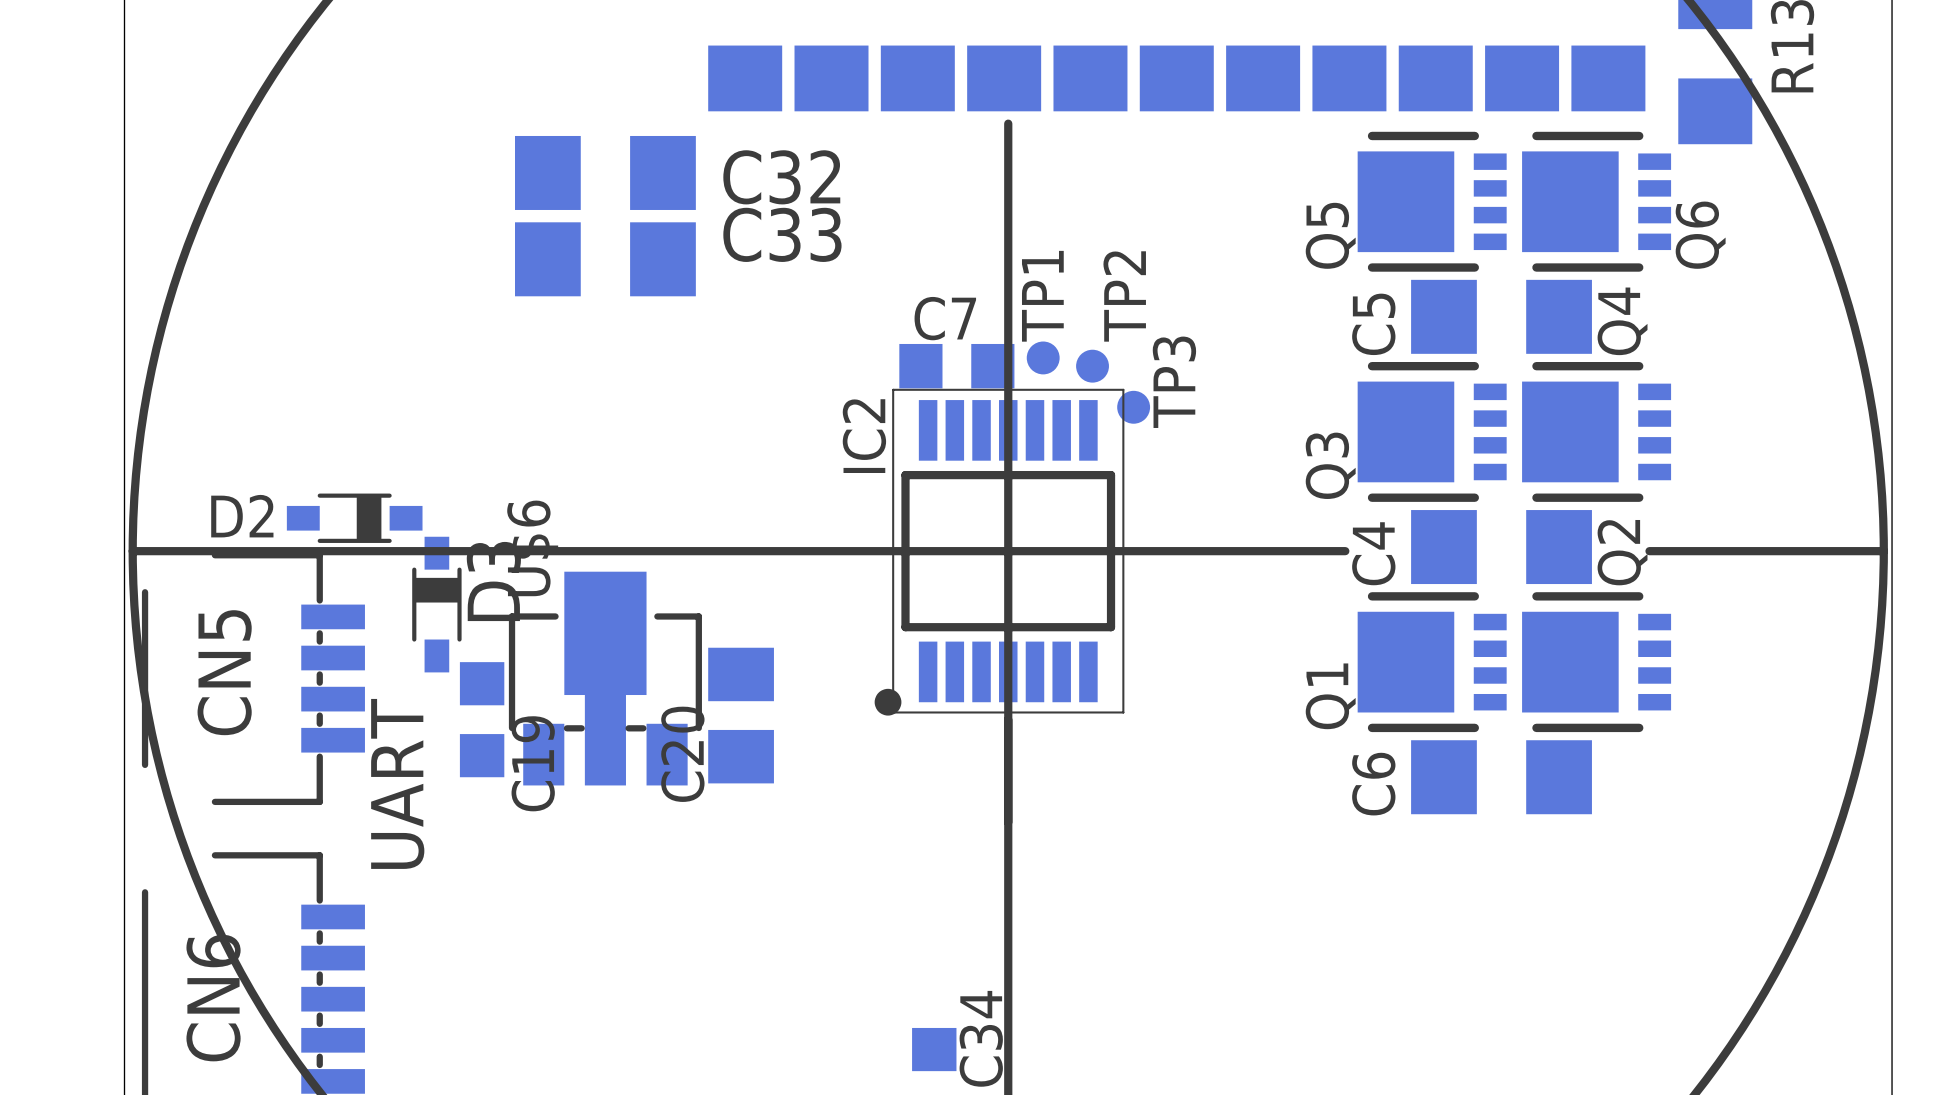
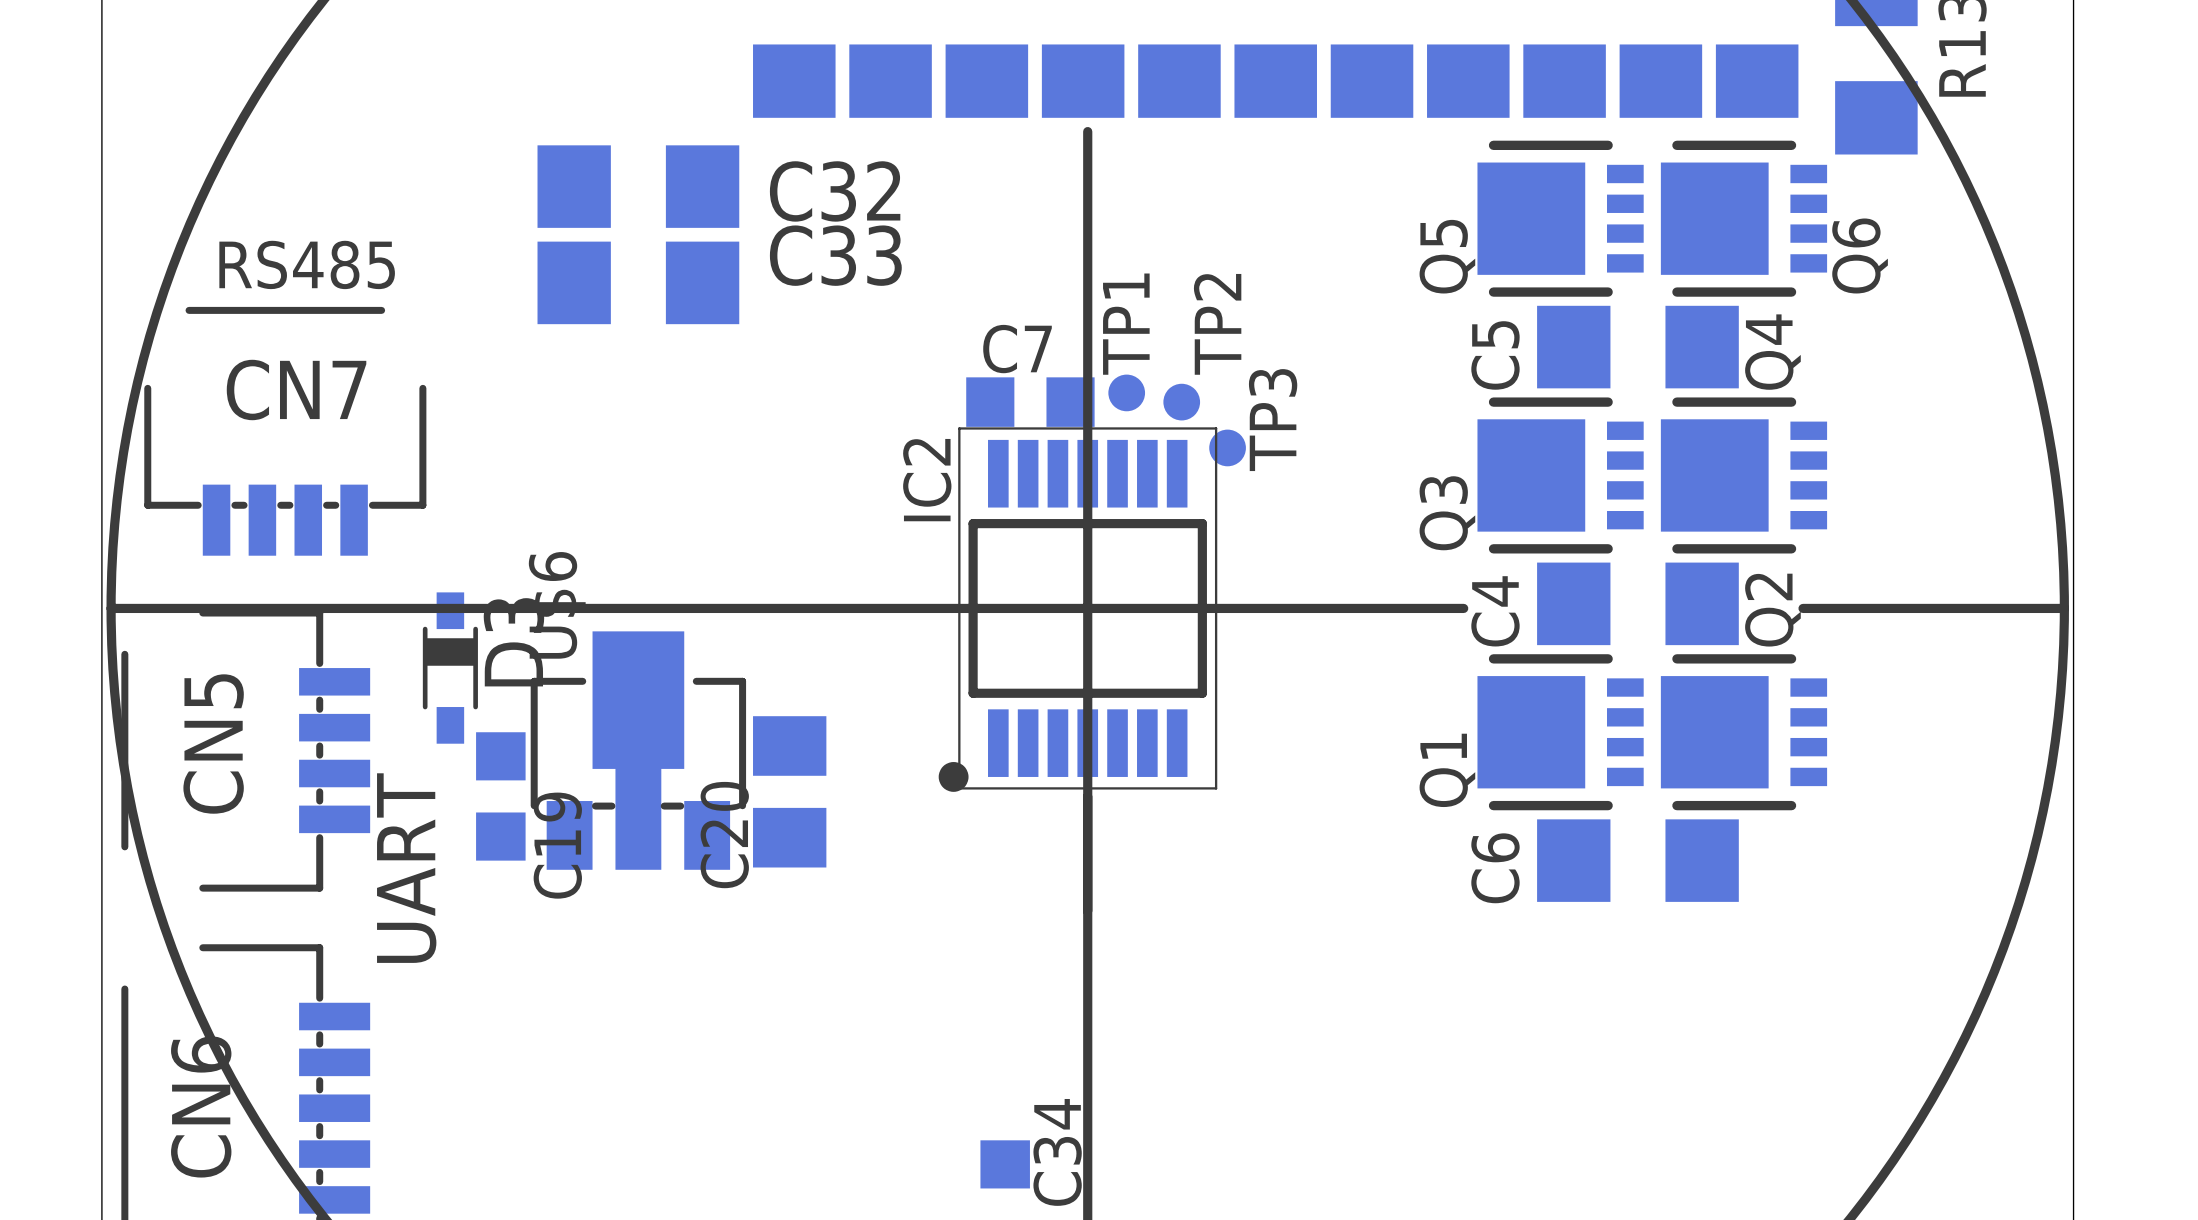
text: none -> RS485 (307, 264)
CN7: none -> (285, 431)
D2: (354, 518) -> none

